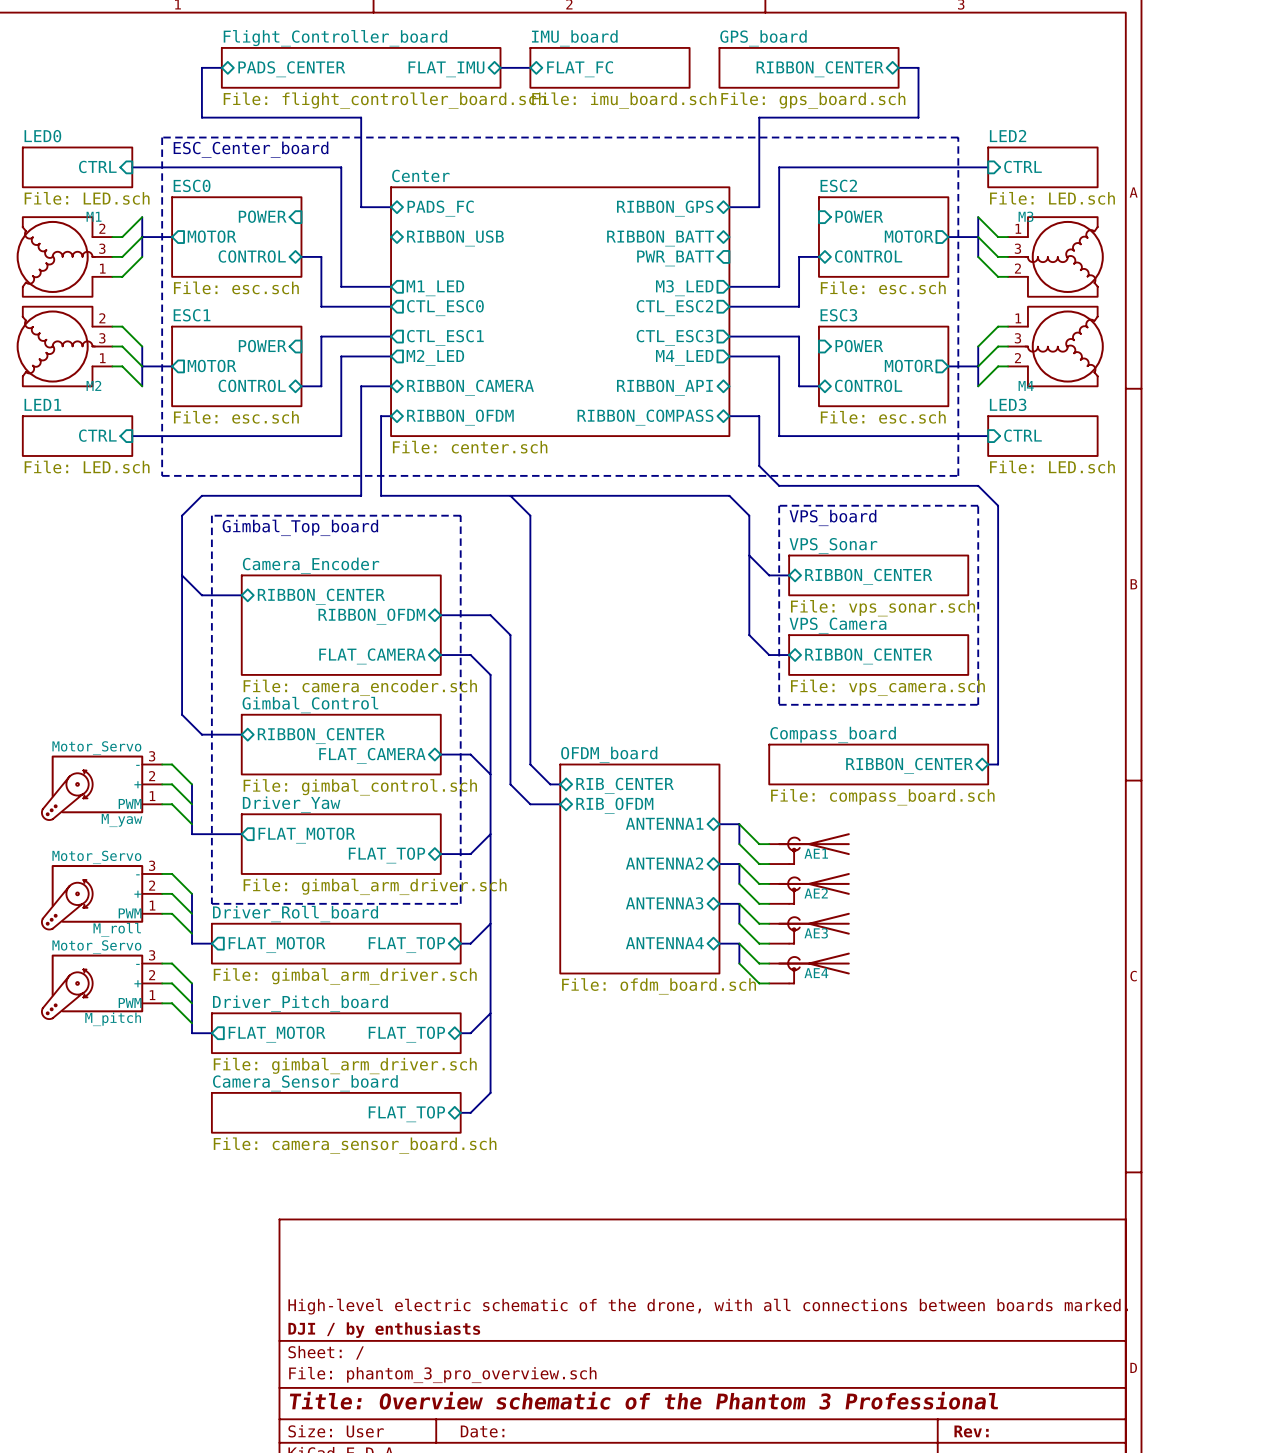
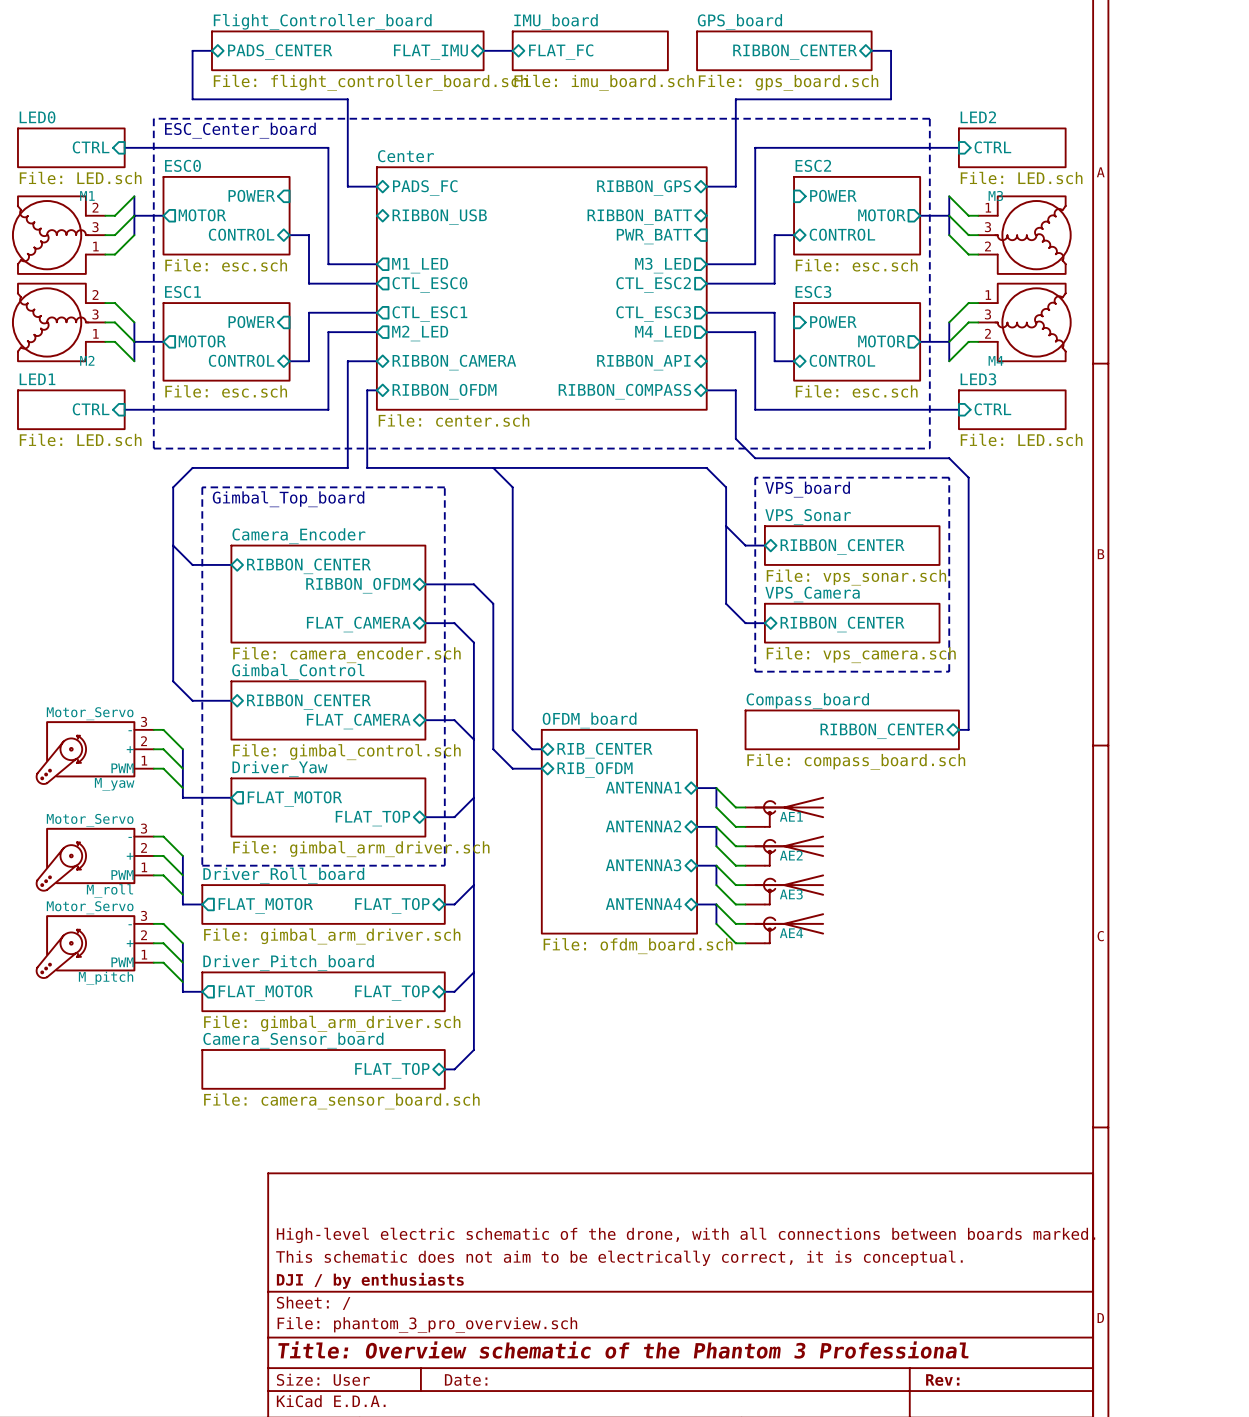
title block: none -> High-level electric schematic of the drone, with all connections between boards marked. (686, 1235)
title block: High-level electric schematic of the drone, with all connections between boards marked. (708, 1306) -> This schematic does not aim to be electrically correct, it is conceptual. (619, 1258)

